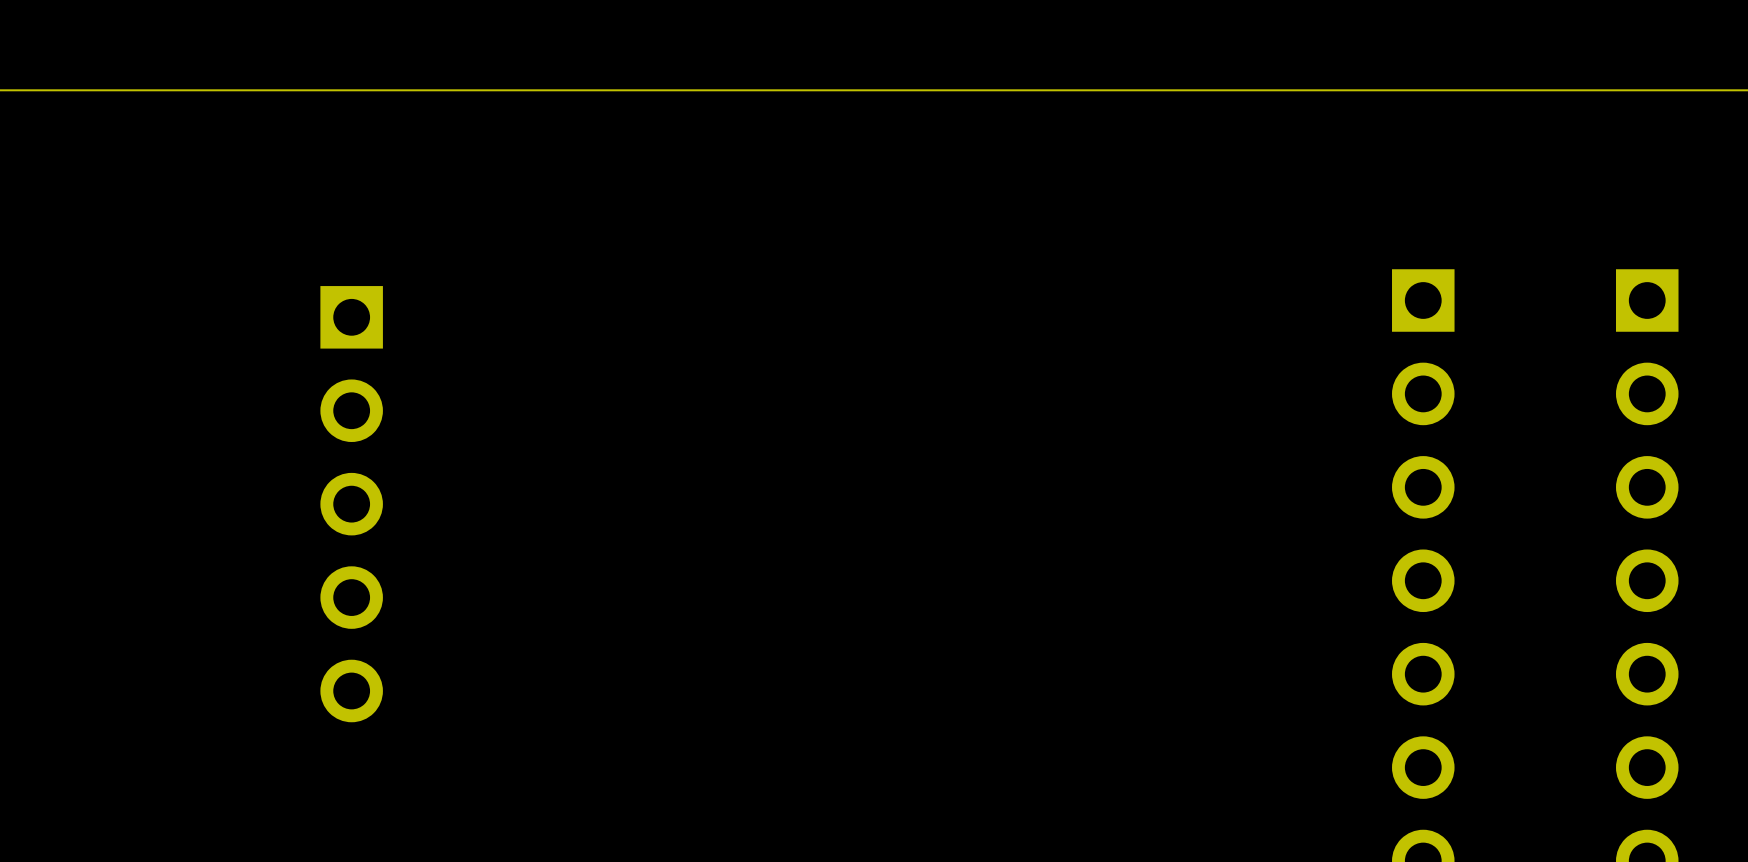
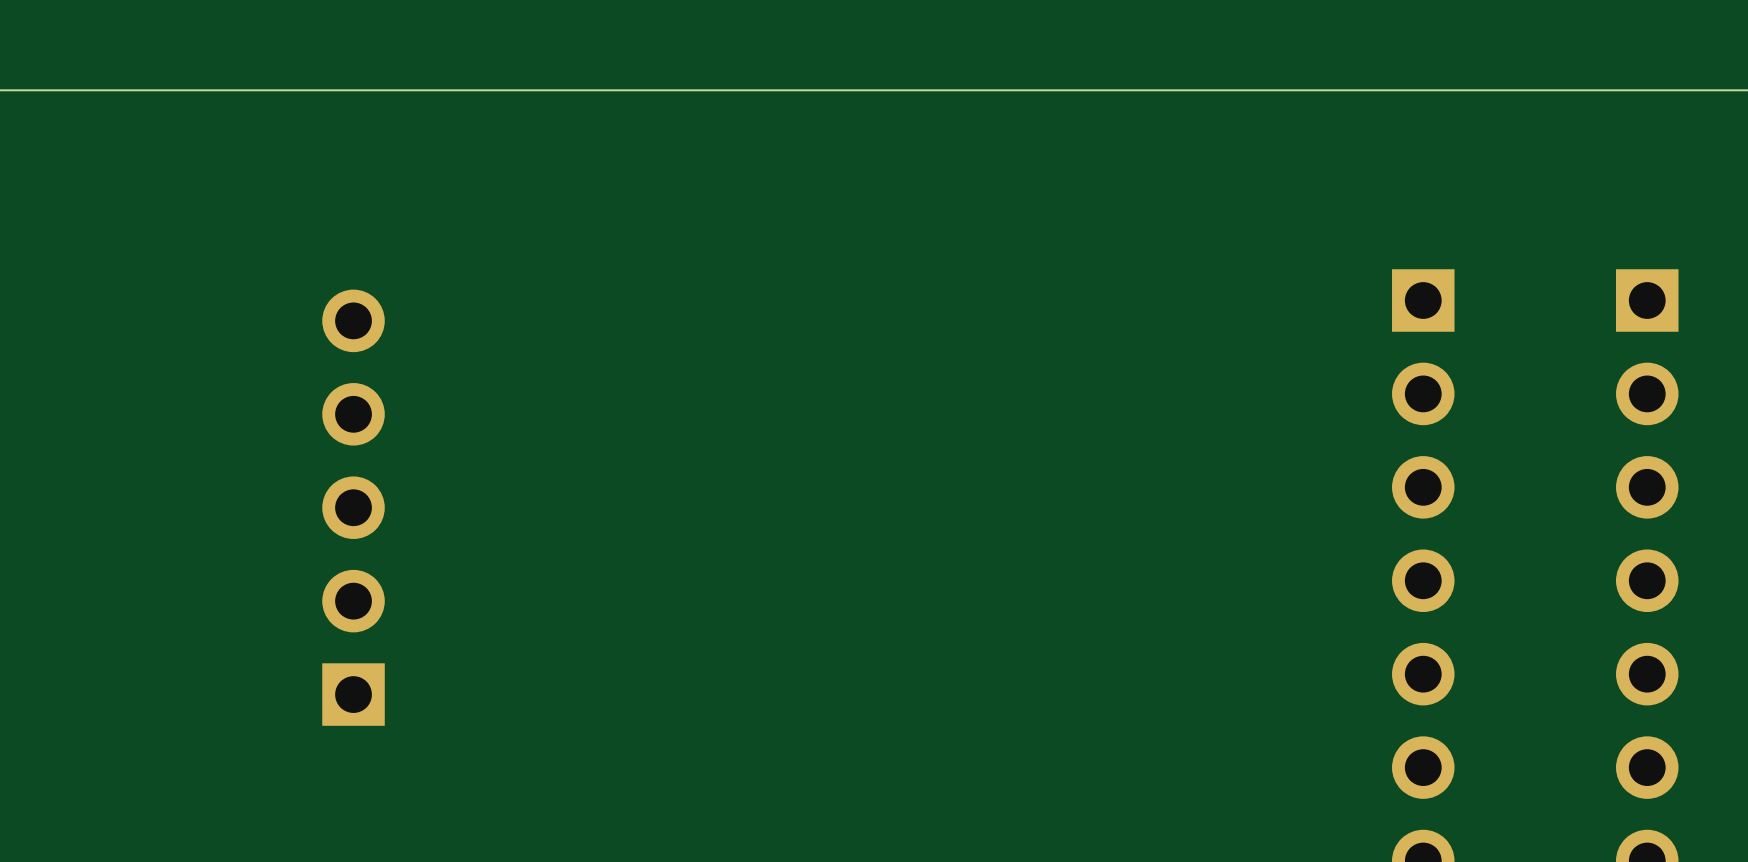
part rotation: 0° (351, 504) -> 180° (353, 507)

